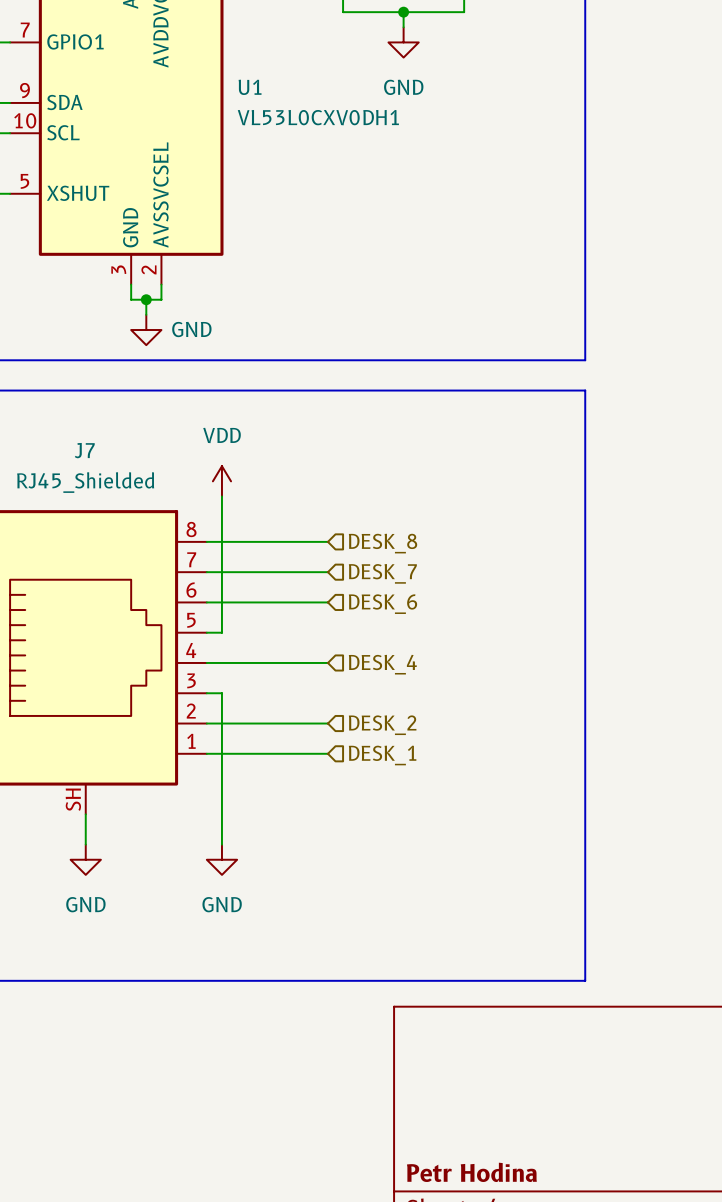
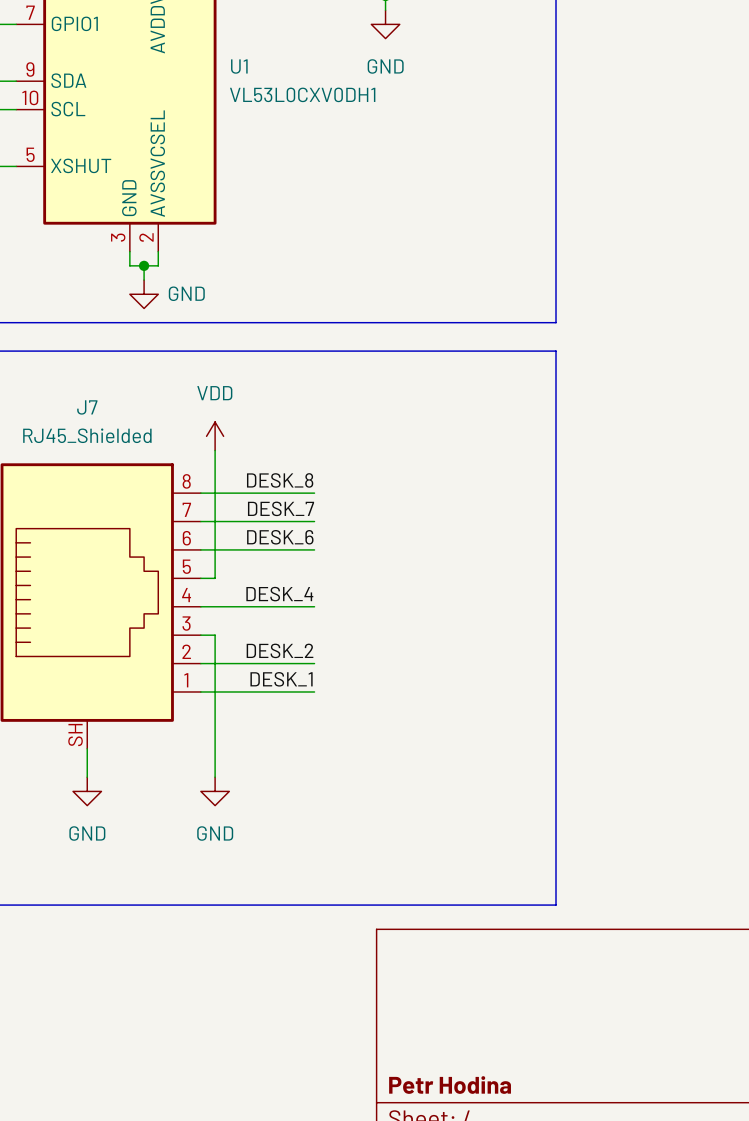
label: none -> DESK_8 (280, 480)
hierarchical label: DESK_8 (383, 543) -> none
label: none -> DESK_7 (281, 508)
hierarchical label: DESK_7 (382, 573) -> none
label: none -> DESK_6 (280, 537)
hierarchical label: DESK_6 (382, 604) -> none
label: none -> DESK_4 (279, 594)
hierarchical label: DESK_4 (382, 664) -> none
label: none -> DESK_2 (280, 650)
hierarchical label: DESK_2 (382, 725) -> none
label: none -> DESK_1 (281, 679)
hierarchical label: DESK_1 (382, 755) -> none

